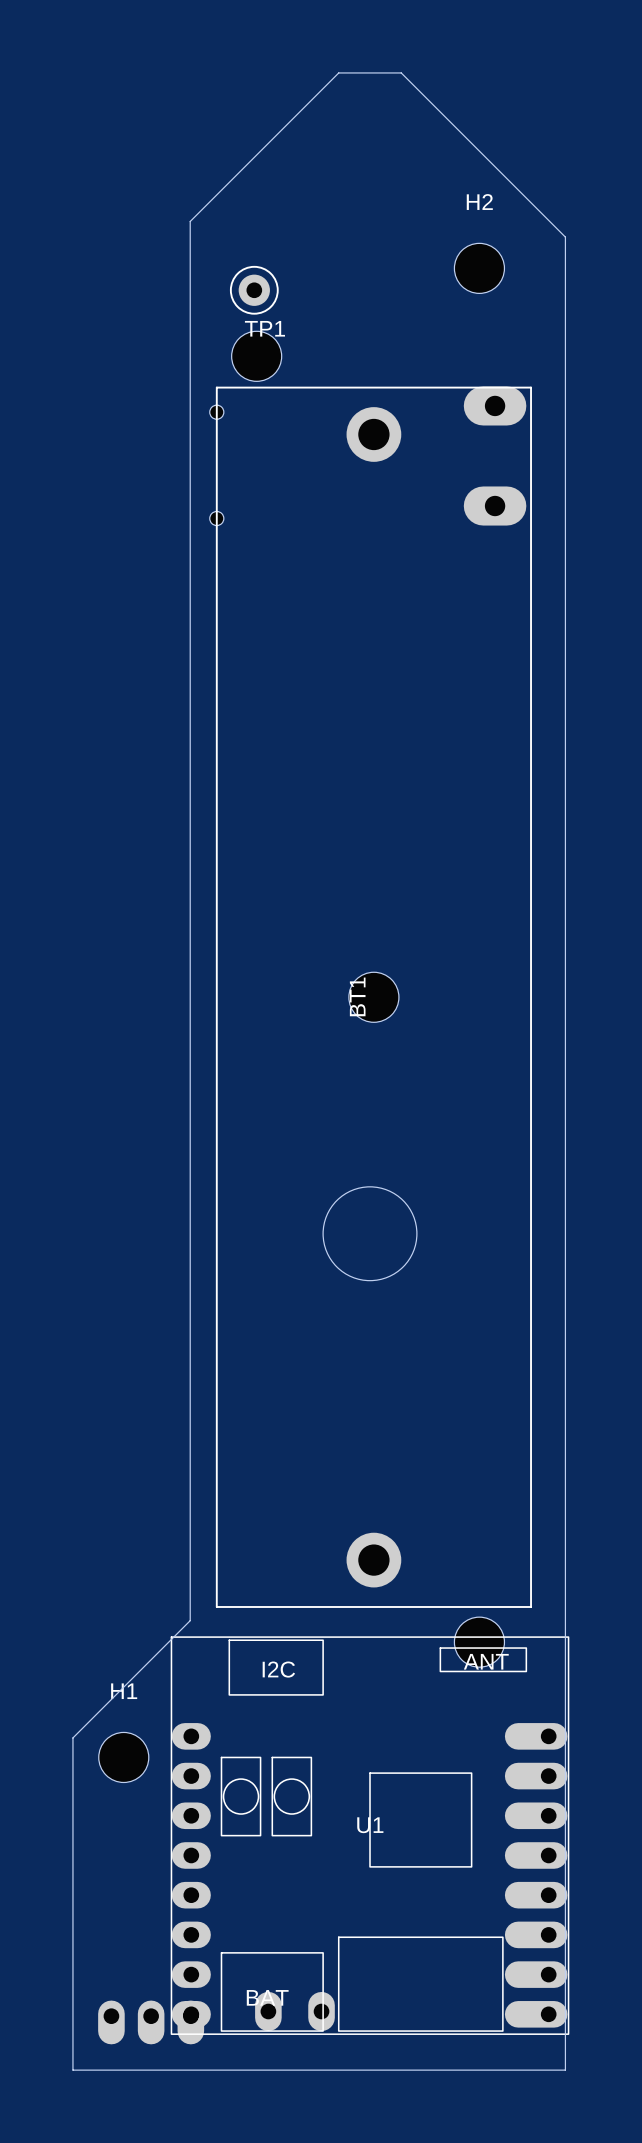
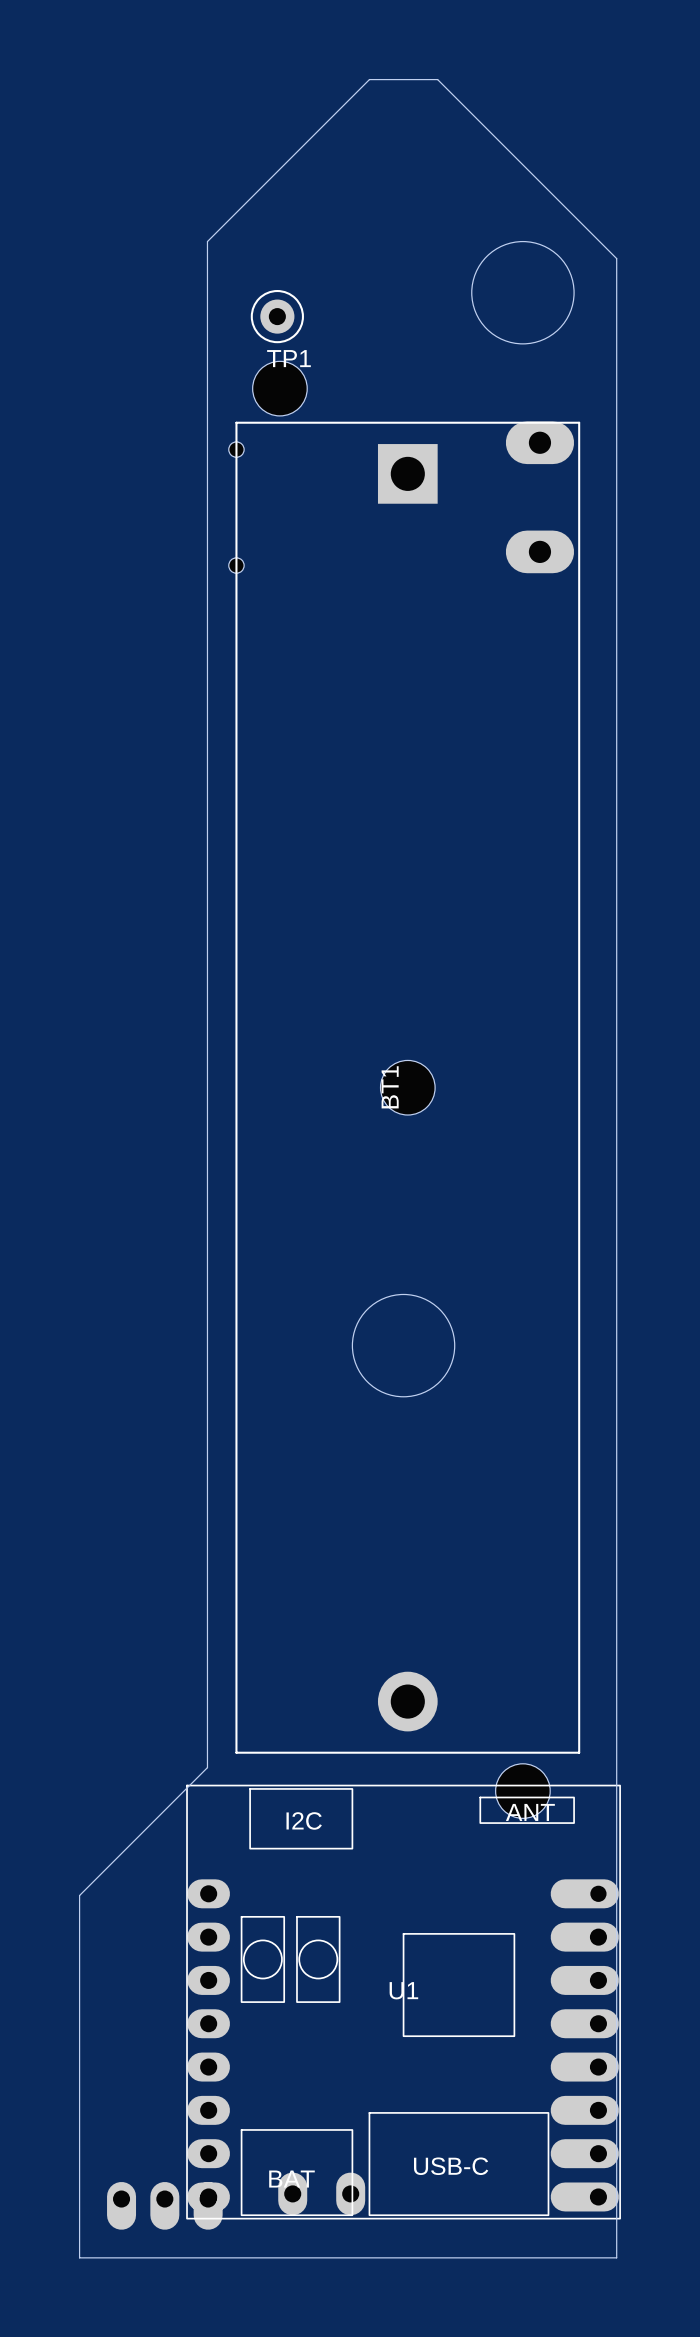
round board edge: none -> [471, 241, 575, 345]
H2: (479, 268) -> none
BT1 footprint: [215, 331, 532, 1668] -> [235, 361, 581, 1819]
U1 footprint: [170, 1636, 570, 2035] -> [186, 1784, 621, 2220]
H1: (123, 1757) -> none

